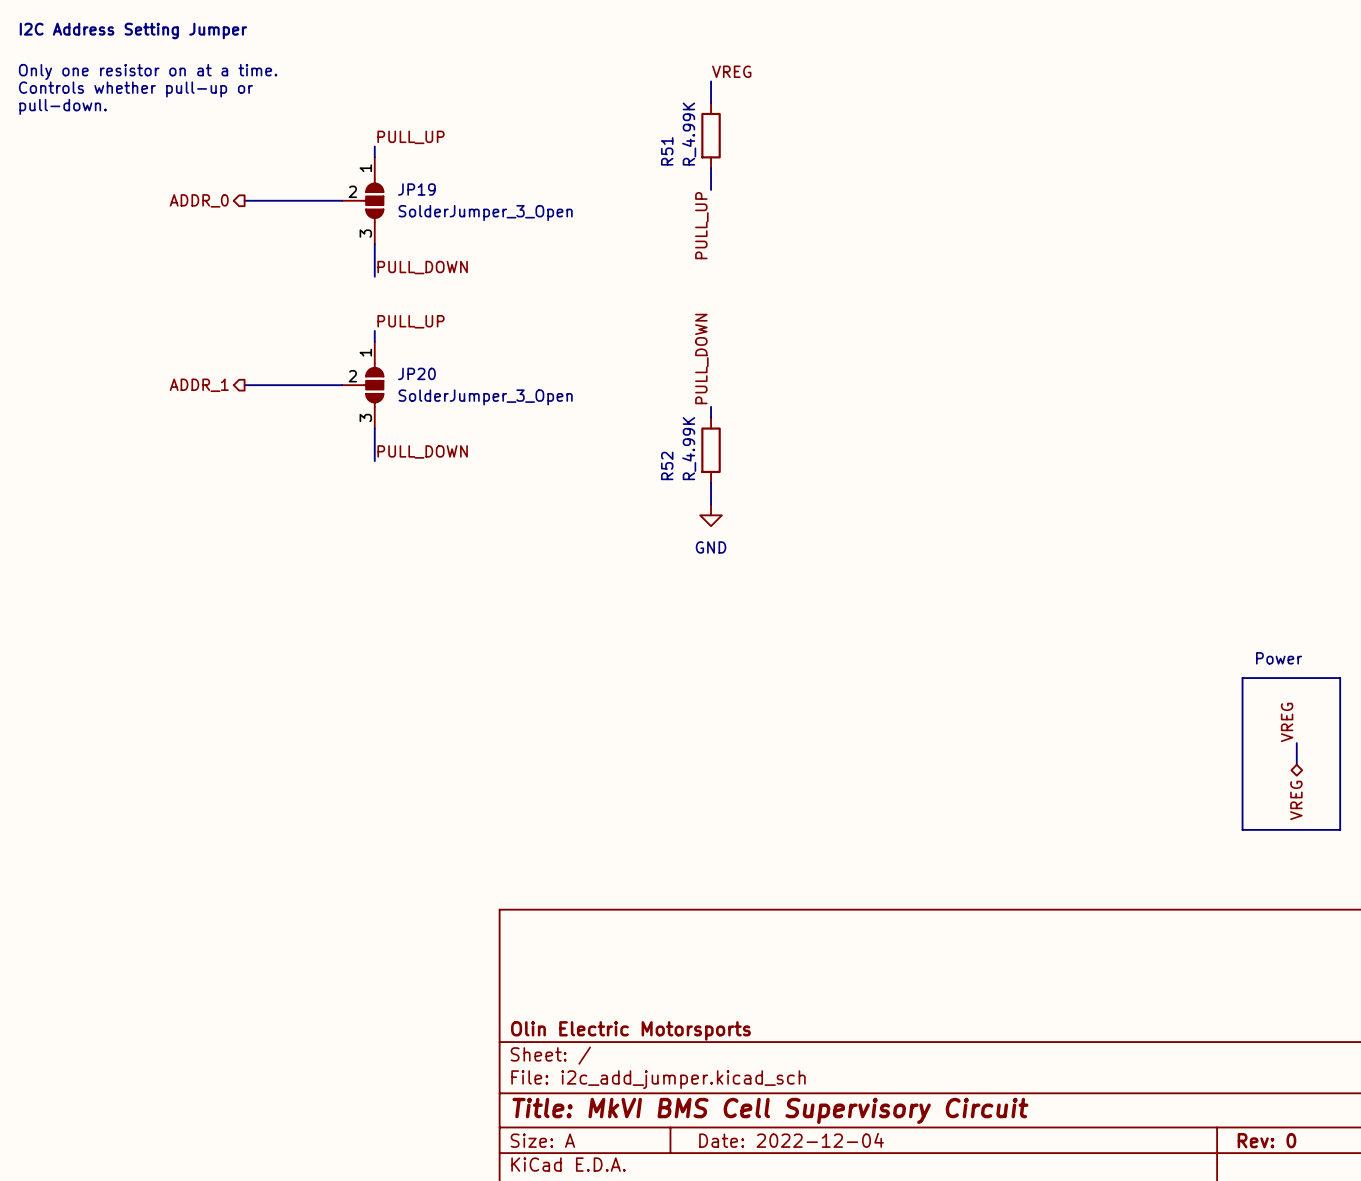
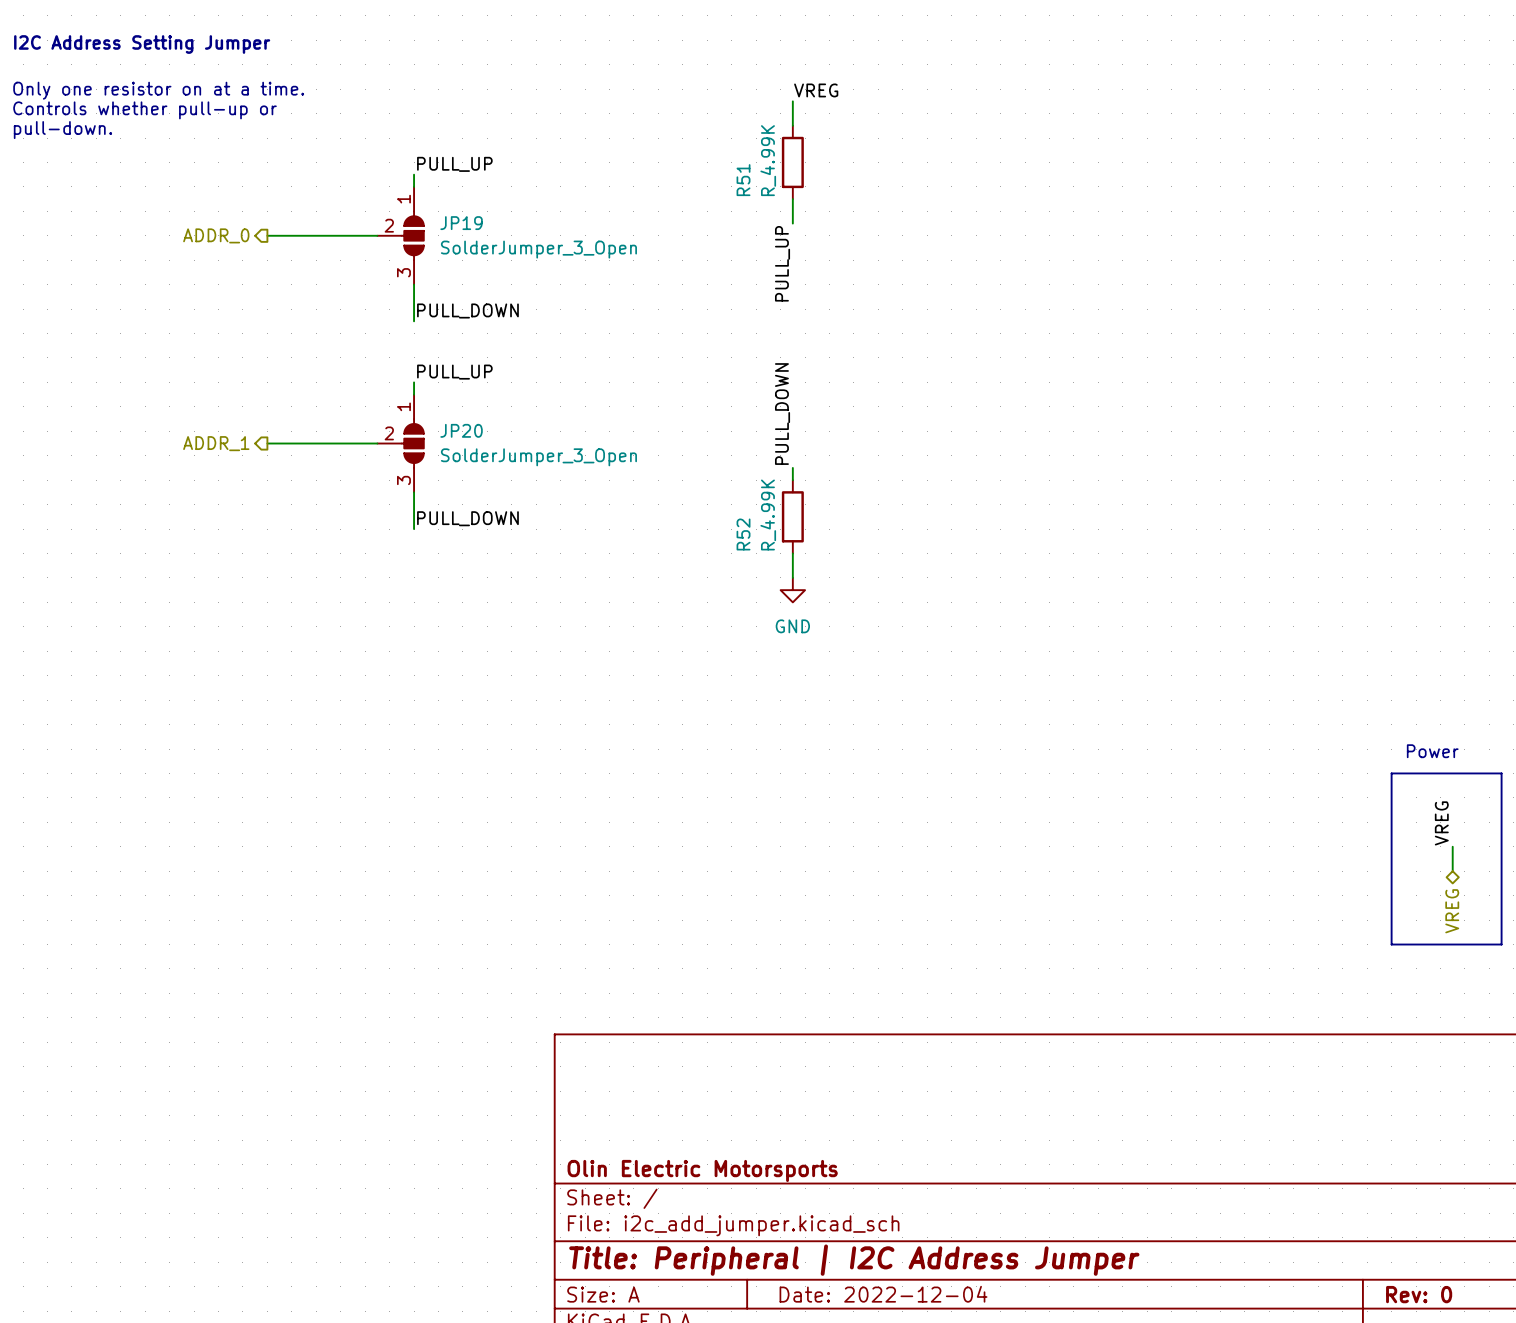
title block: Title: MkVI BMS Cell Supervisory Circuit (770, 1110) -> Title: Peripheral | I2C Address Jumper (854, 1260)

